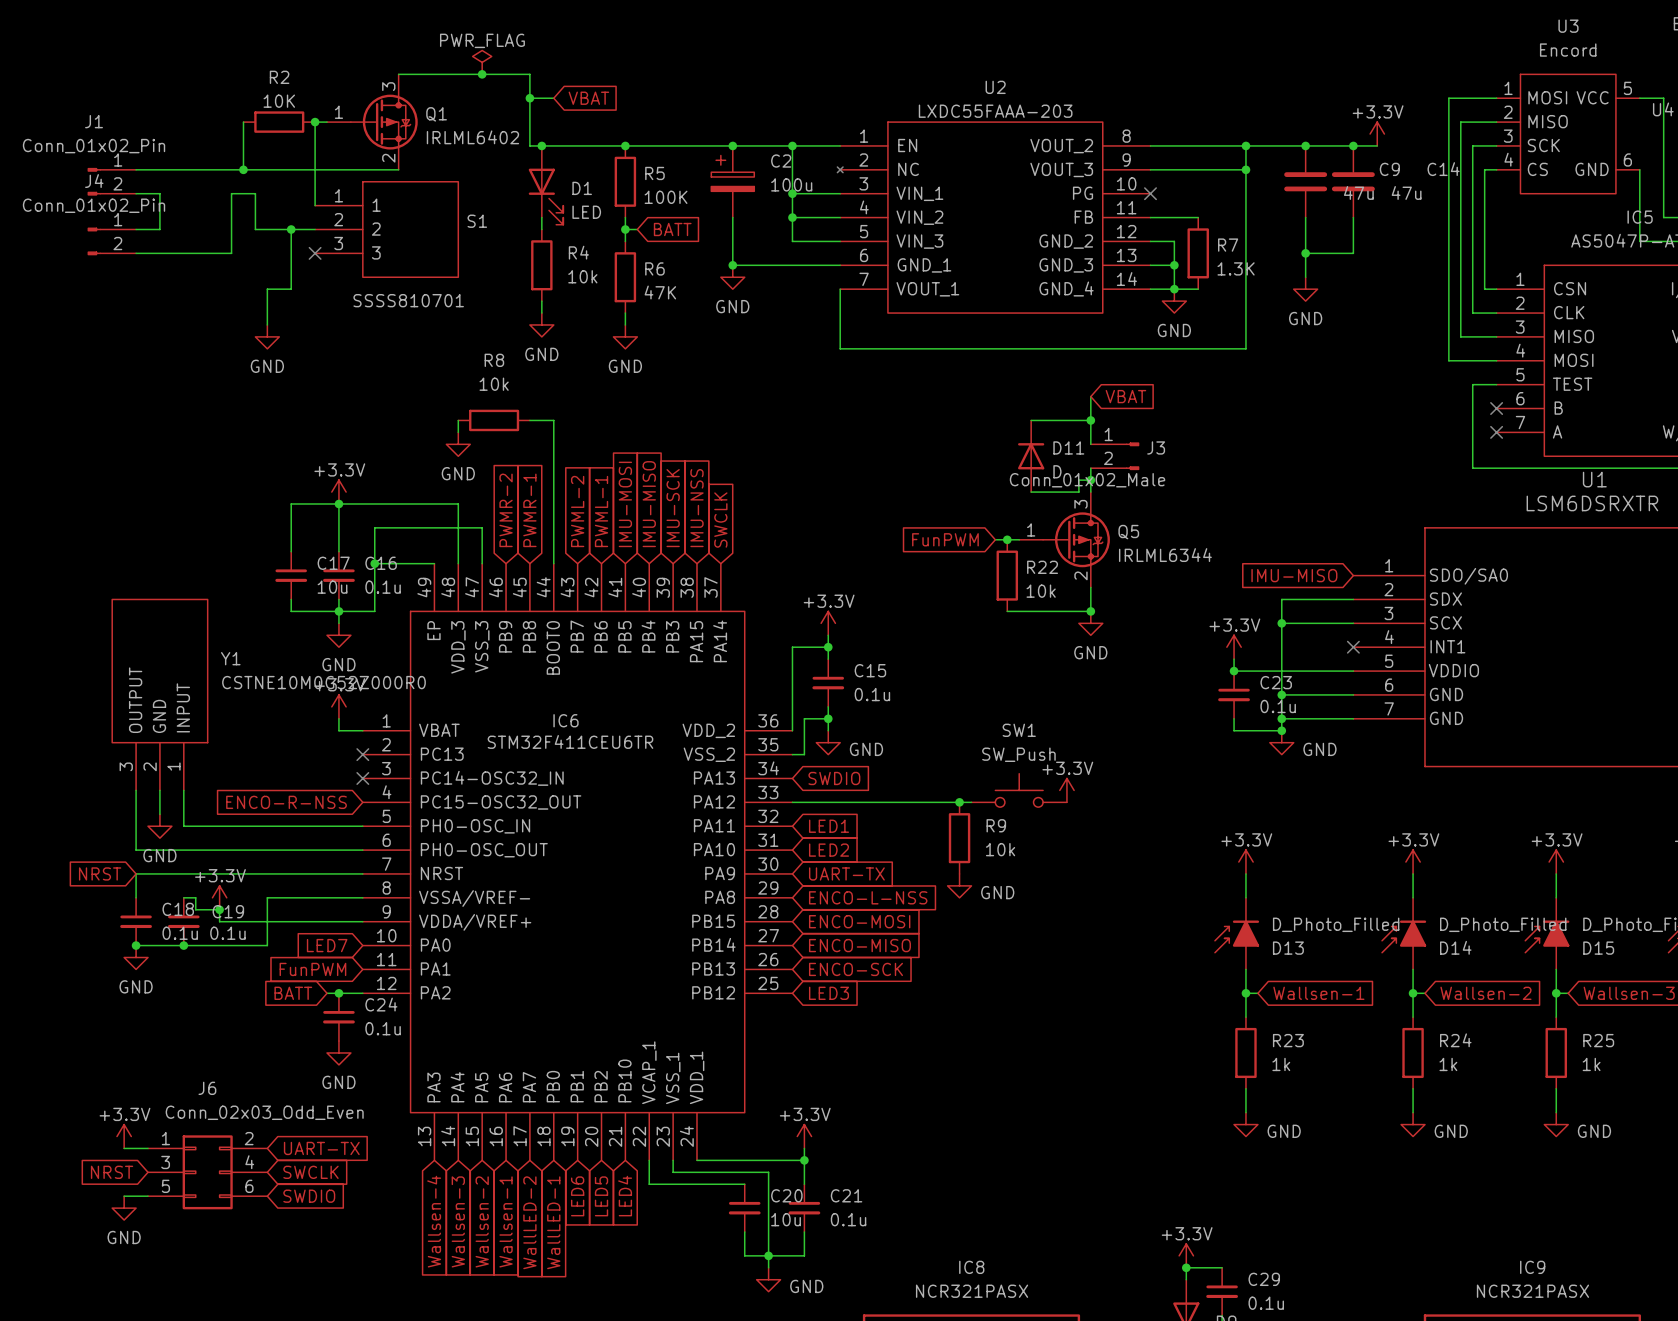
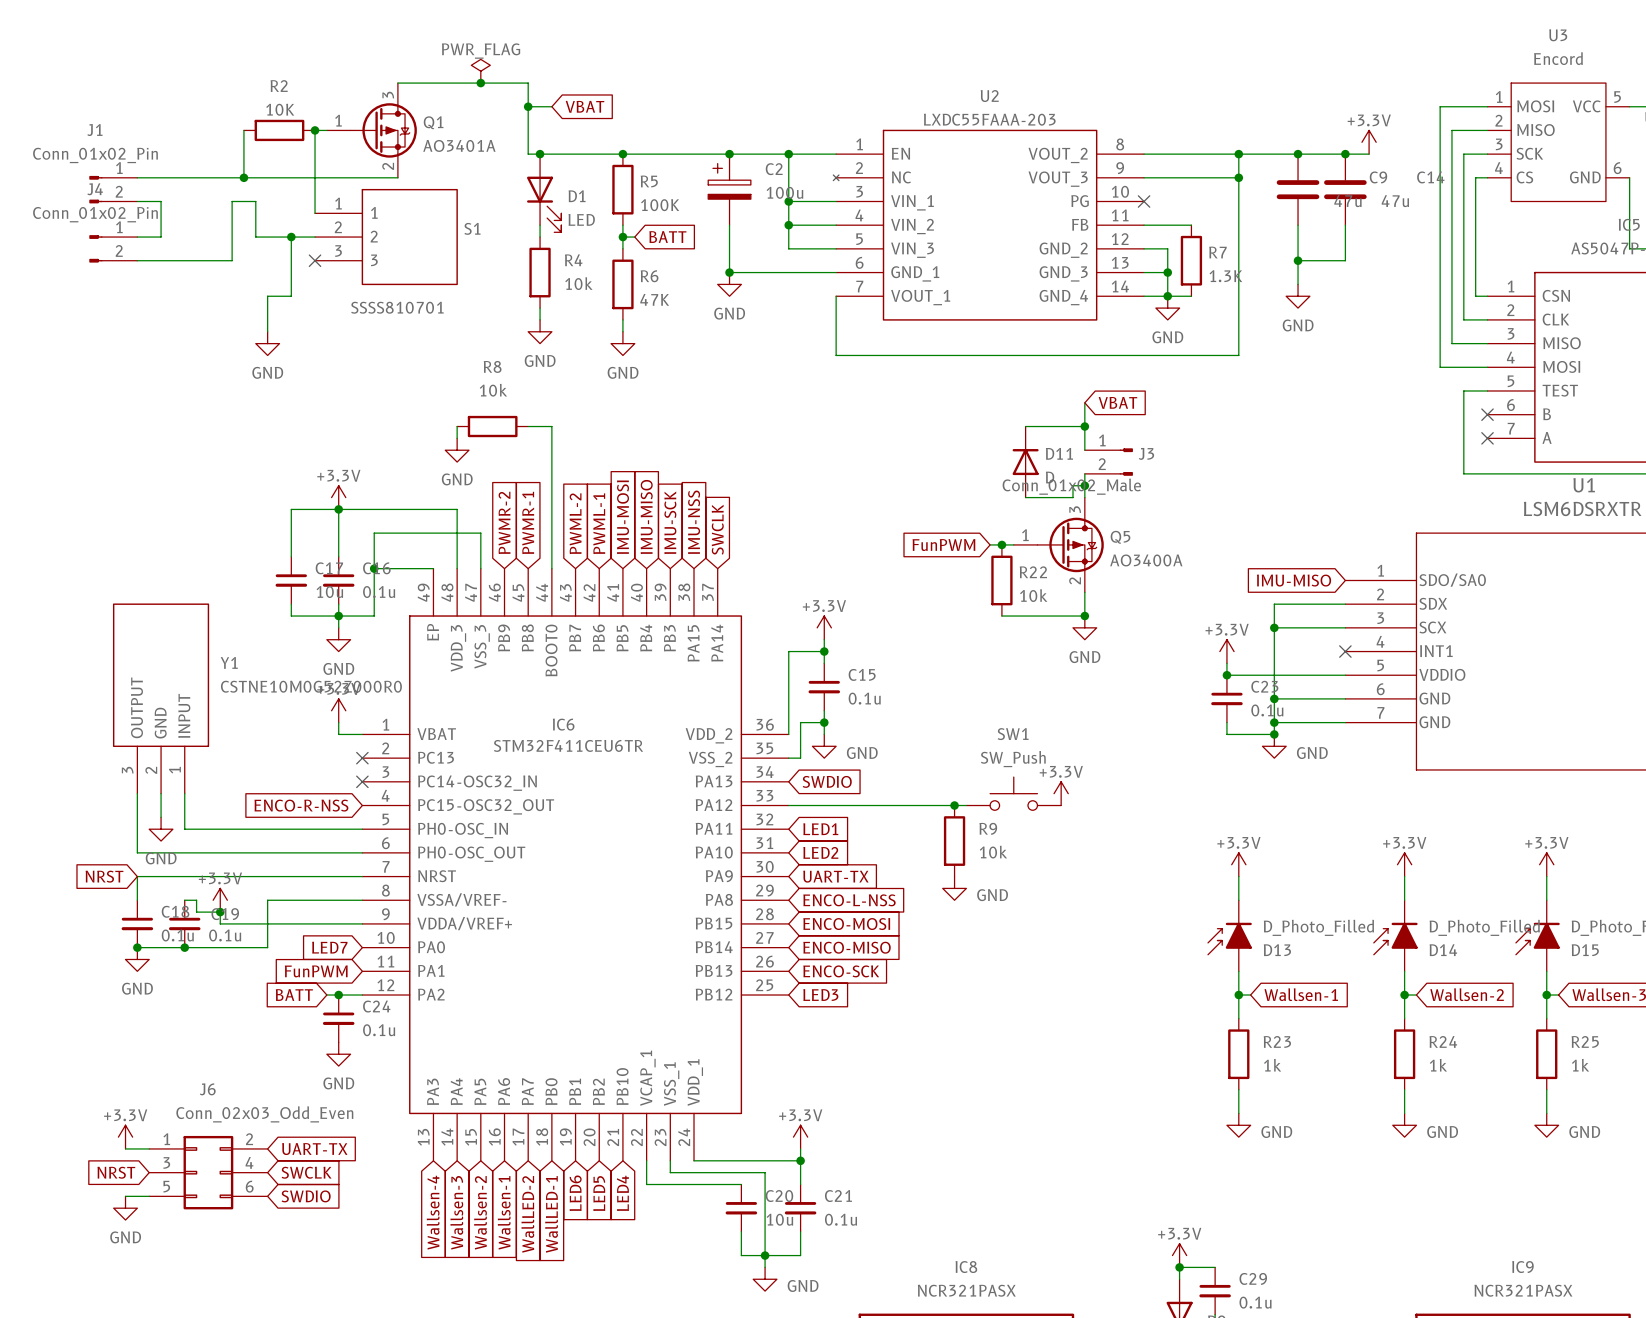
Q1 value: IRLML6402 (472, 137) -> AO3401A (459, 145)
Q5 value: IRLML6344 (1165, 555) -> AO3400A (1146, 560)

